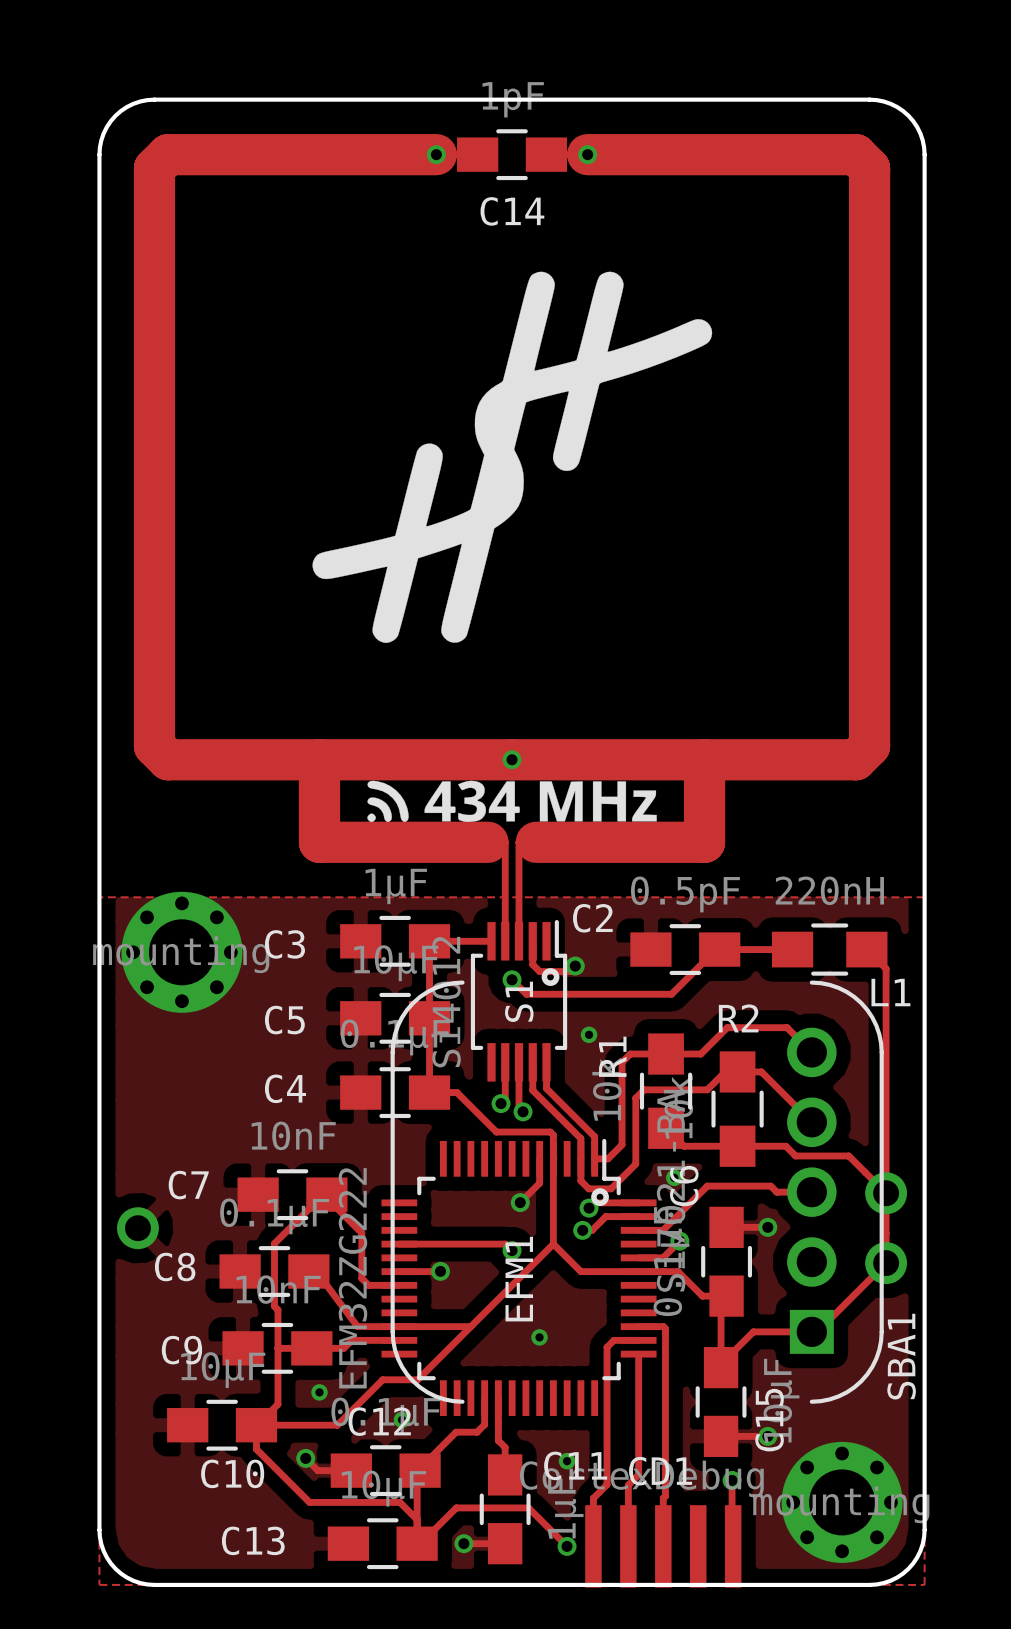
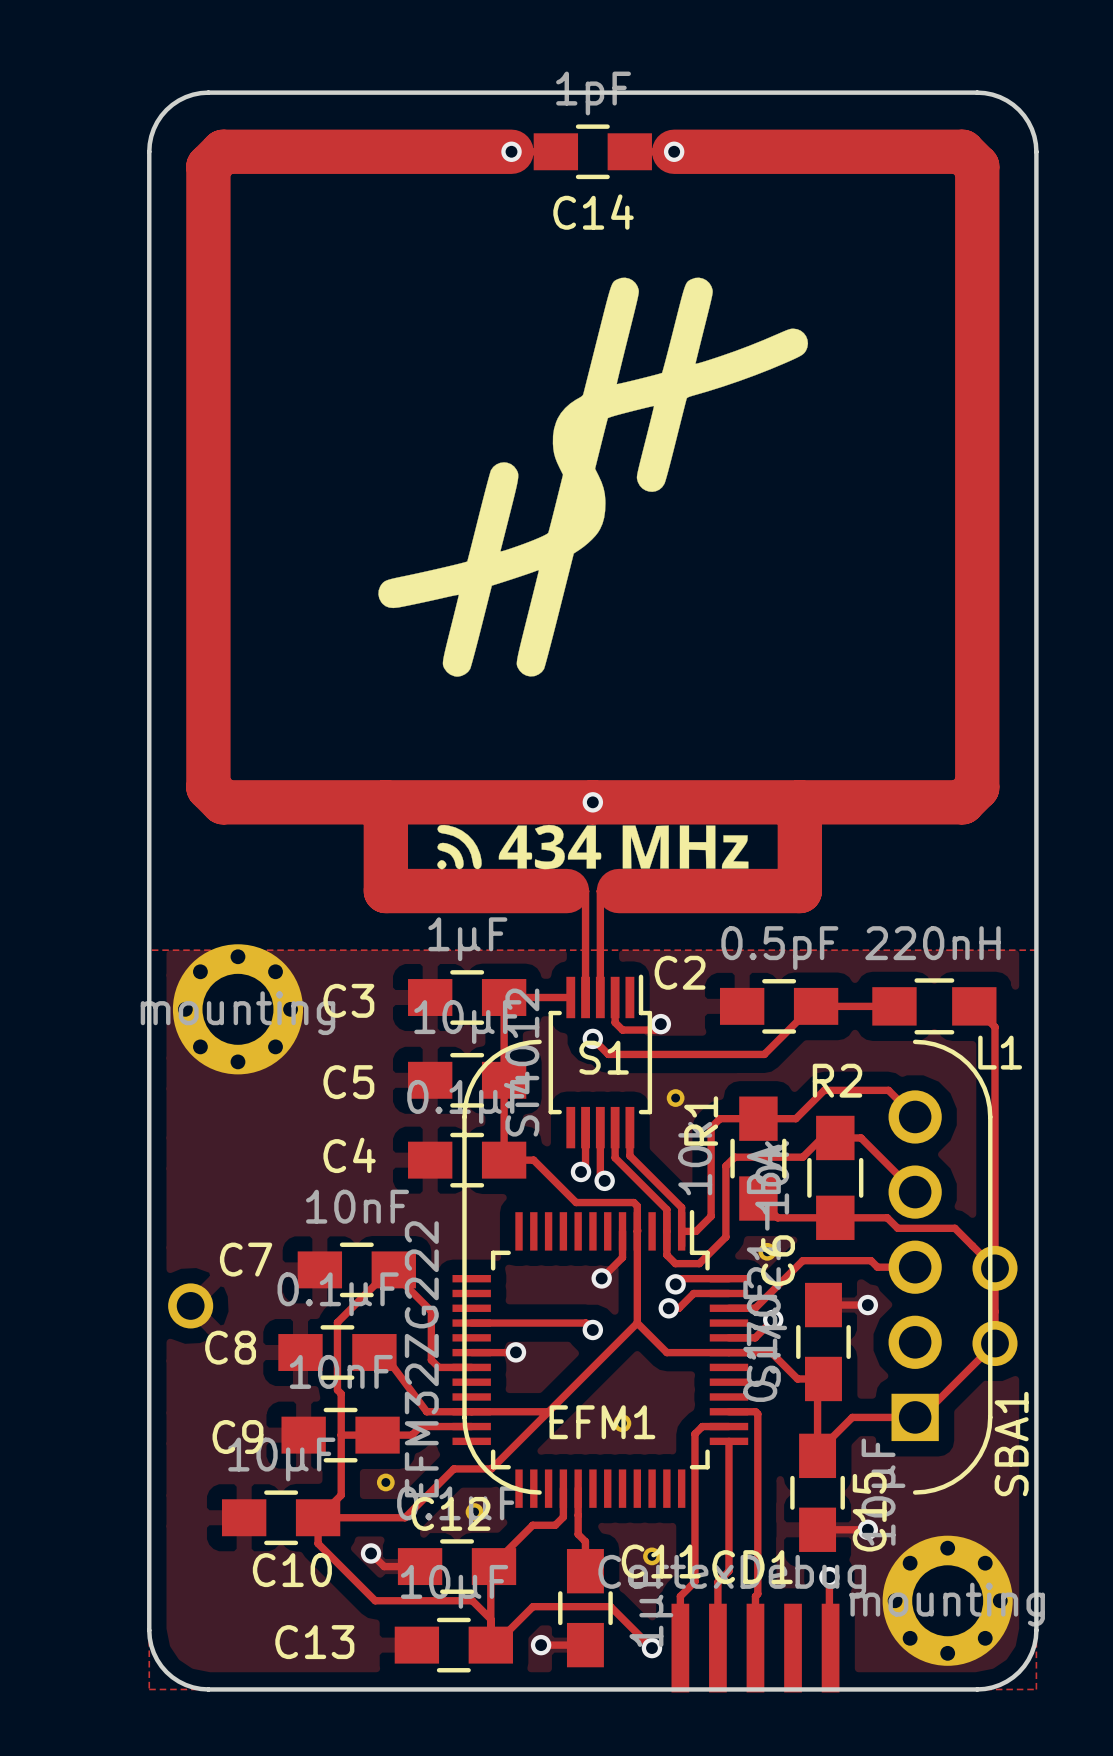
drawing: [541, 968, 560, 986] -> none
S1 name rotation: 0° (519, 1001) -> 90° clockwise (604, 1057)
drawing: [591, 1188, 609, 1207] -> none
EFM1 name rotation: 0° (519, 1279) -> 90° clockwise (602, 1422)

